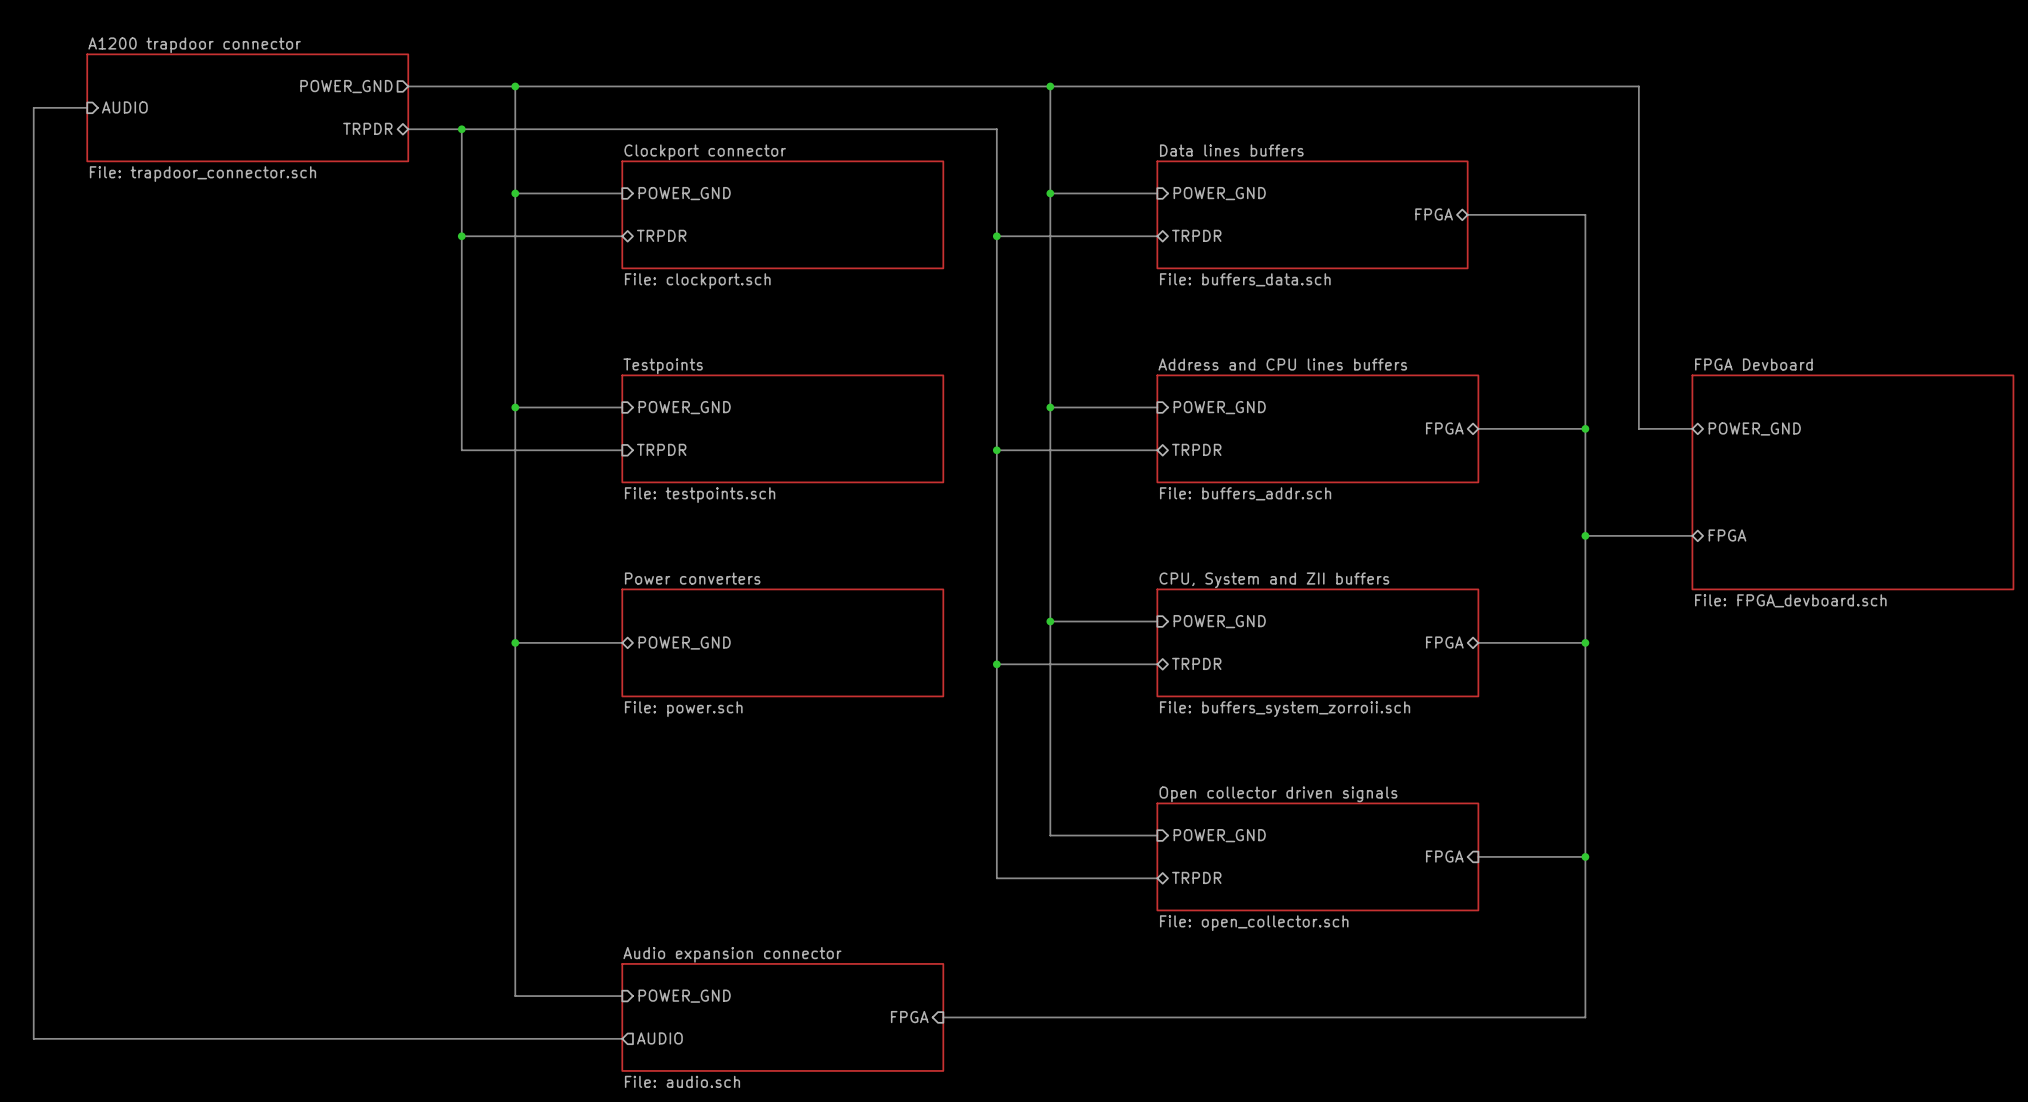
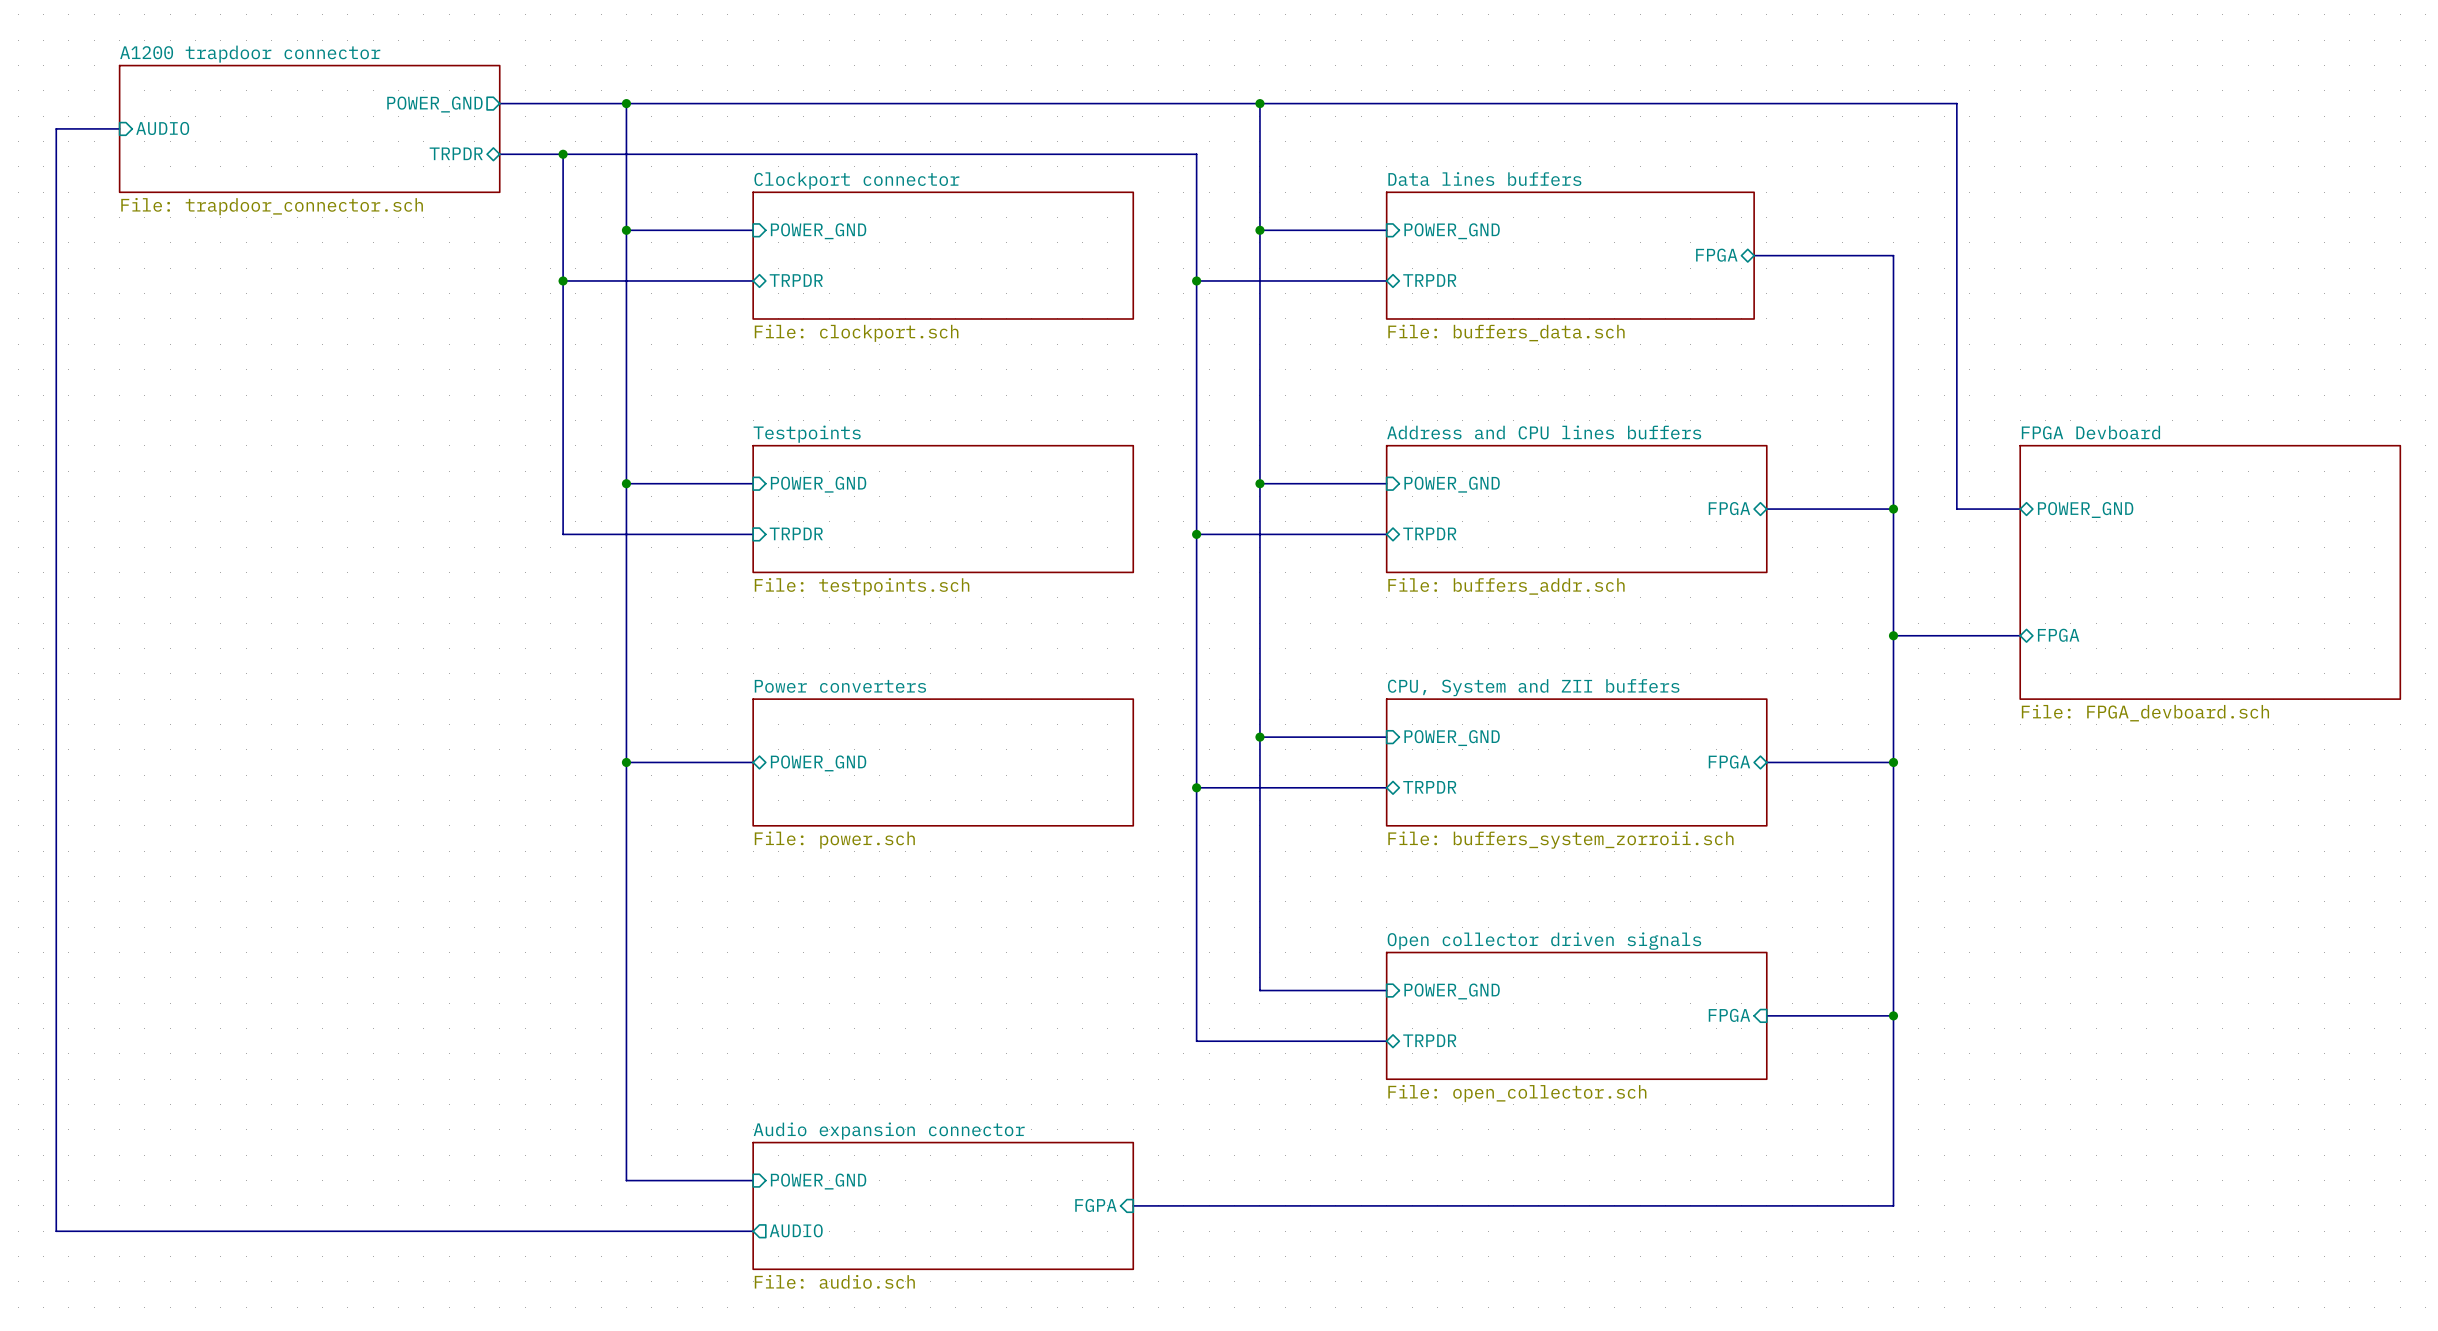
sheet pin: FPGA (909, 1017) -> FGPA (1095, 1205)

